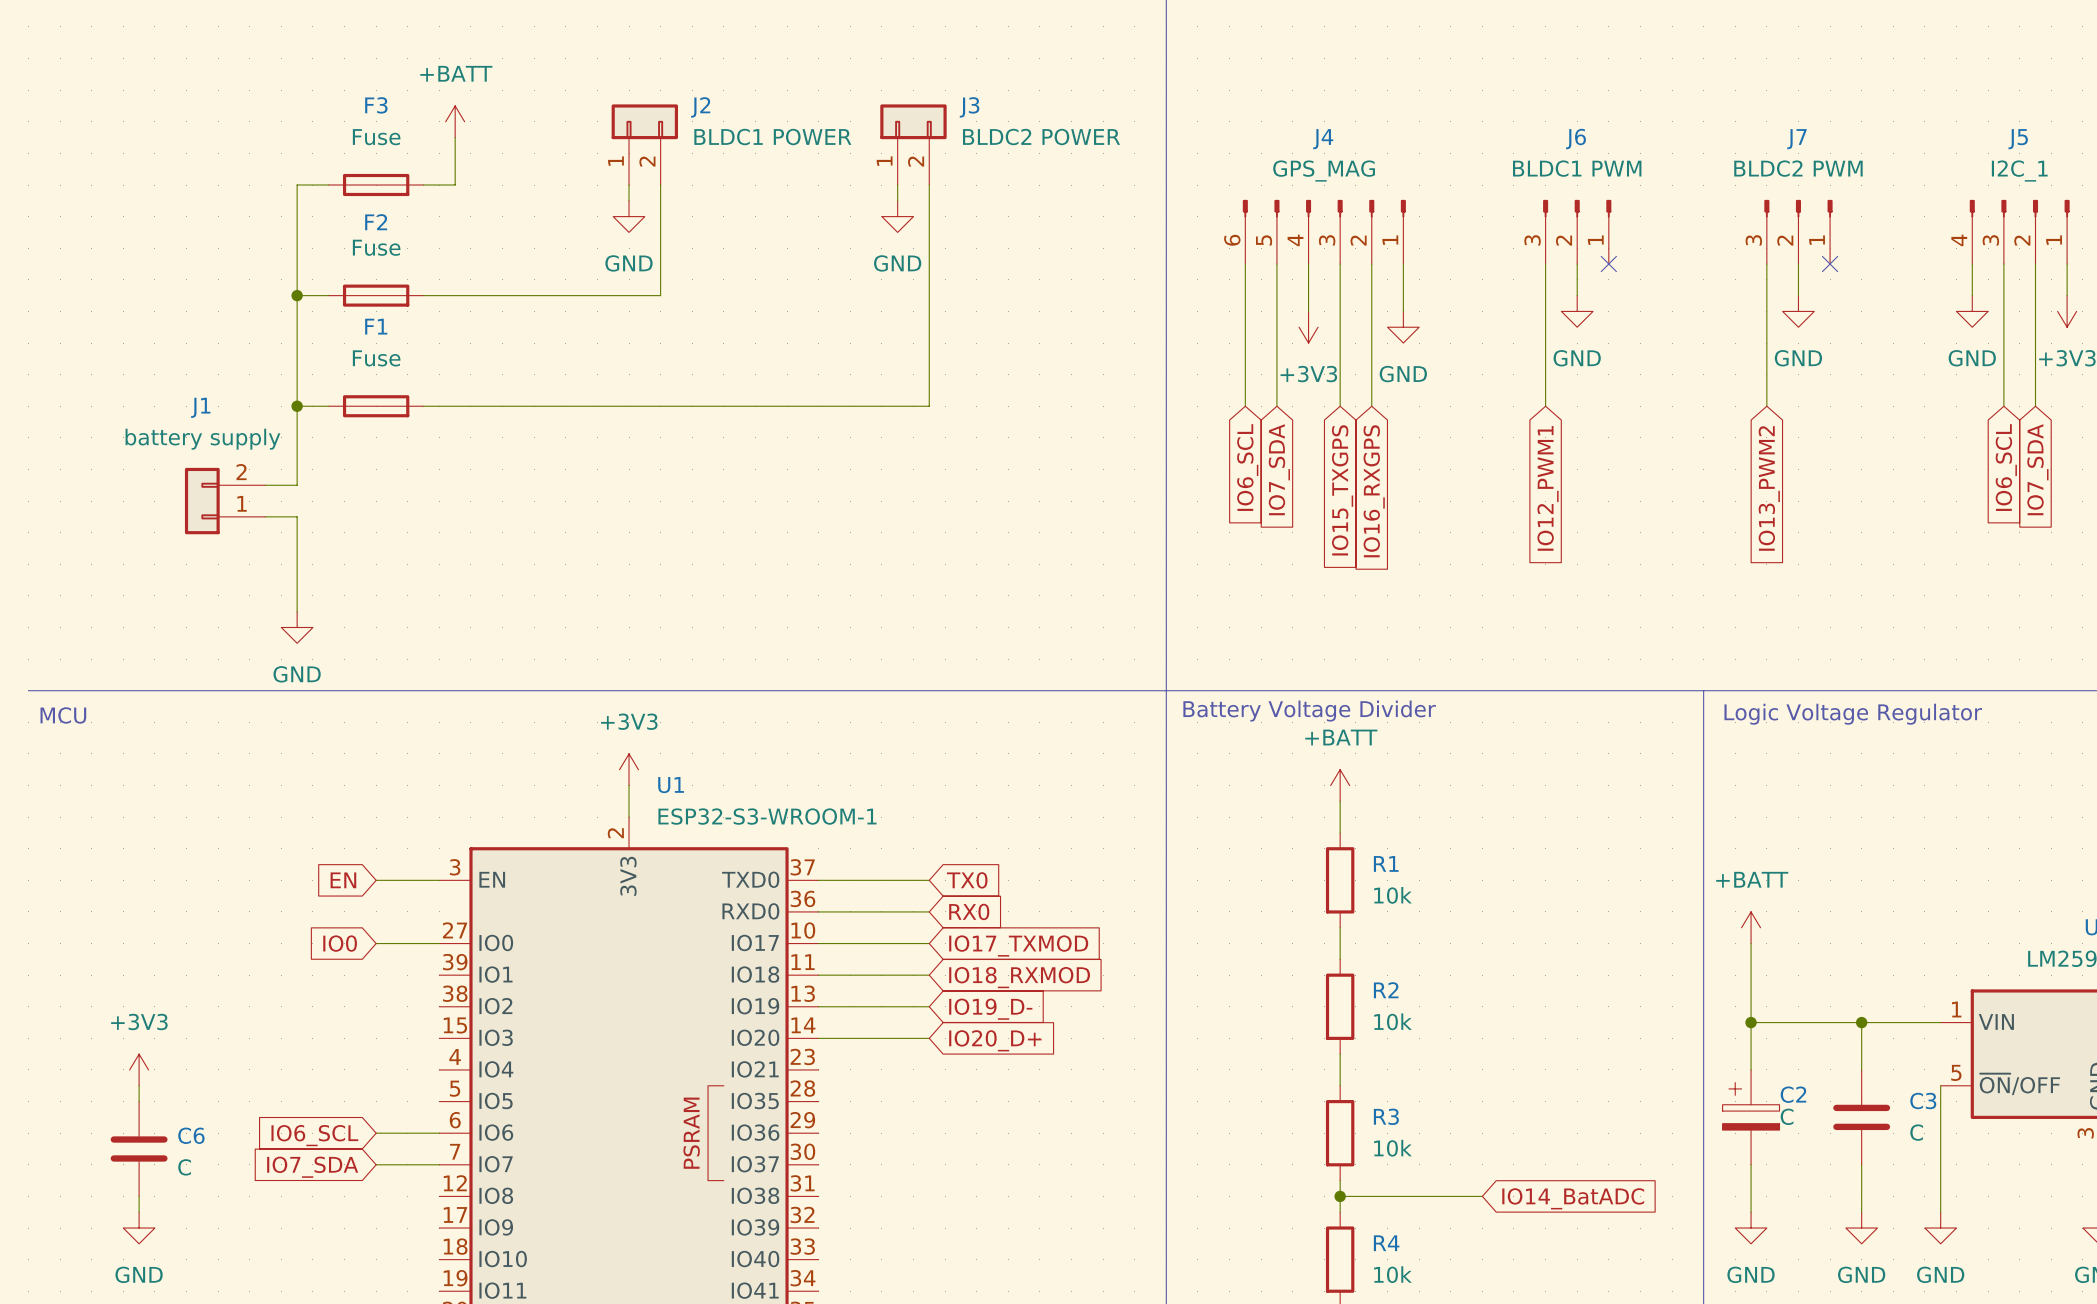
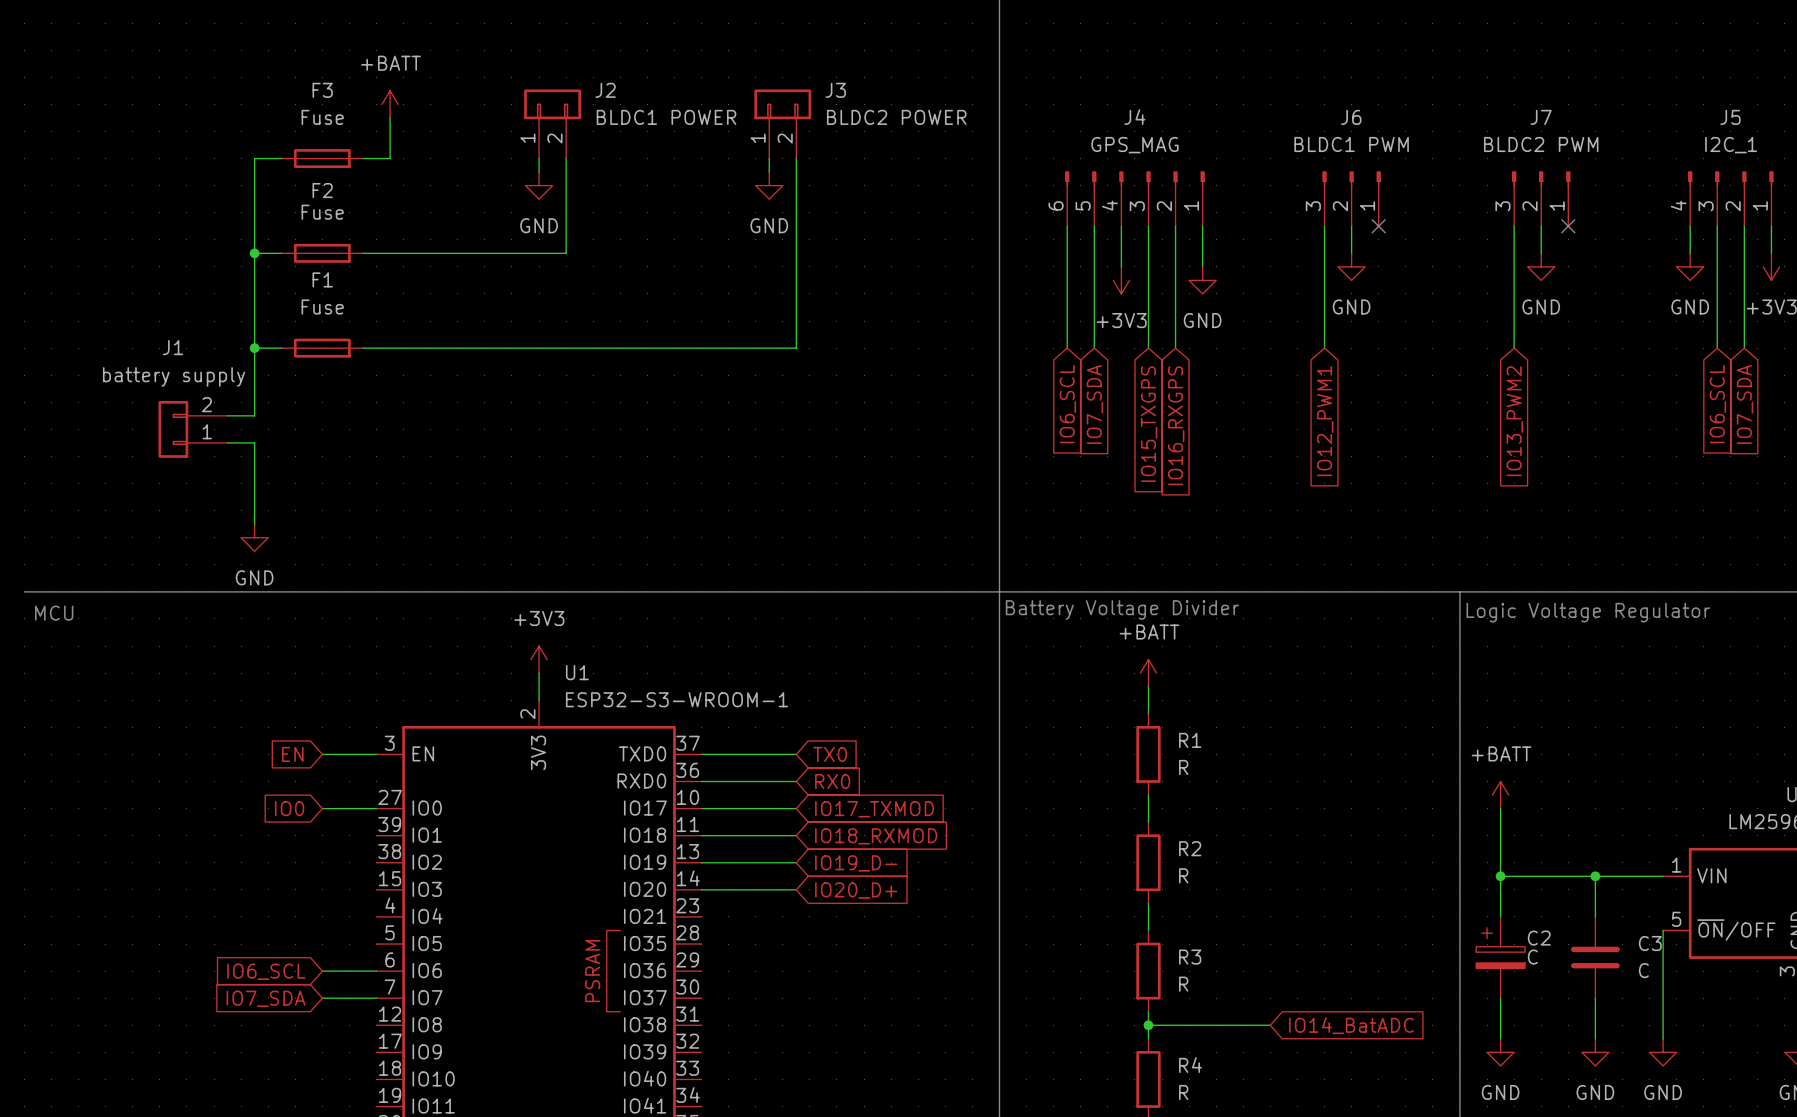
R1 value: 10k (1392, 895) -> R (1183, 767)
R2 value: 10k (1392, 1021) -> R (1183, 875)
power symbol: +3V3 (139, 1069) -> none
wire: (139, 1085) (139, 1101) -> none
R3 value: 10k (1392, 1148) -> R (1183, 984)
C6: C (139, 1149) -> none
wire: (139, 1196) (139, 1212) -> none
power symbol: GND (139, 1228) -> none
R4 value: 10k (1392, 1274) -> R (1183, 1092)

